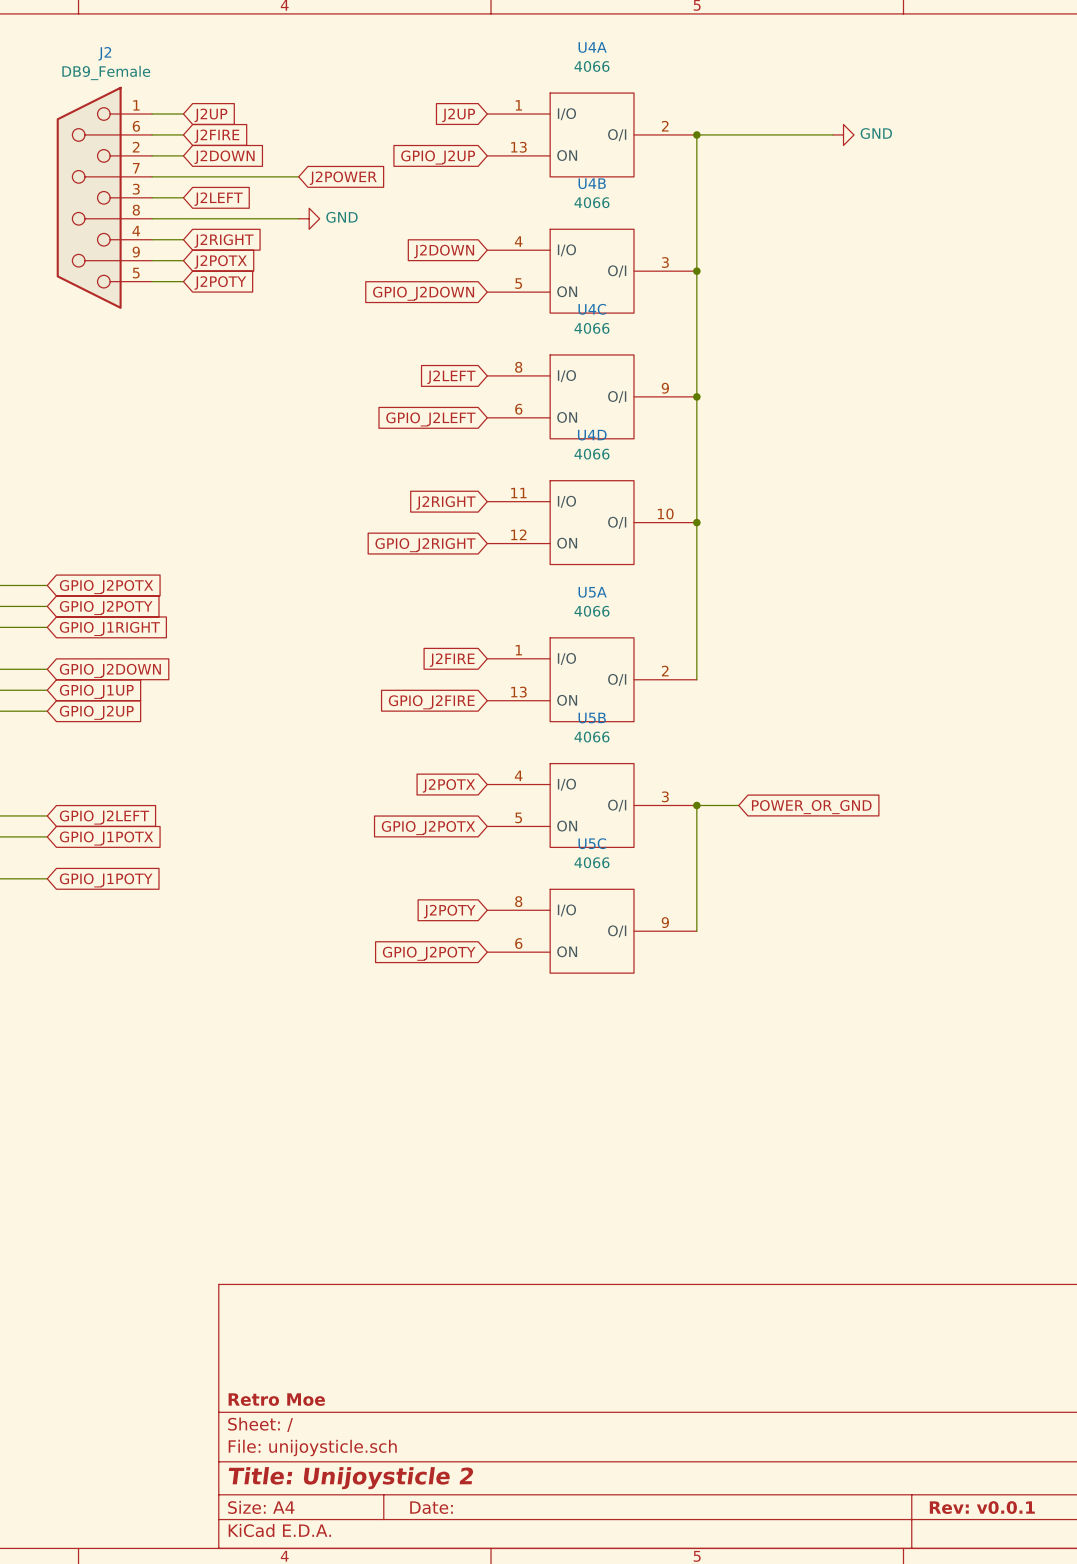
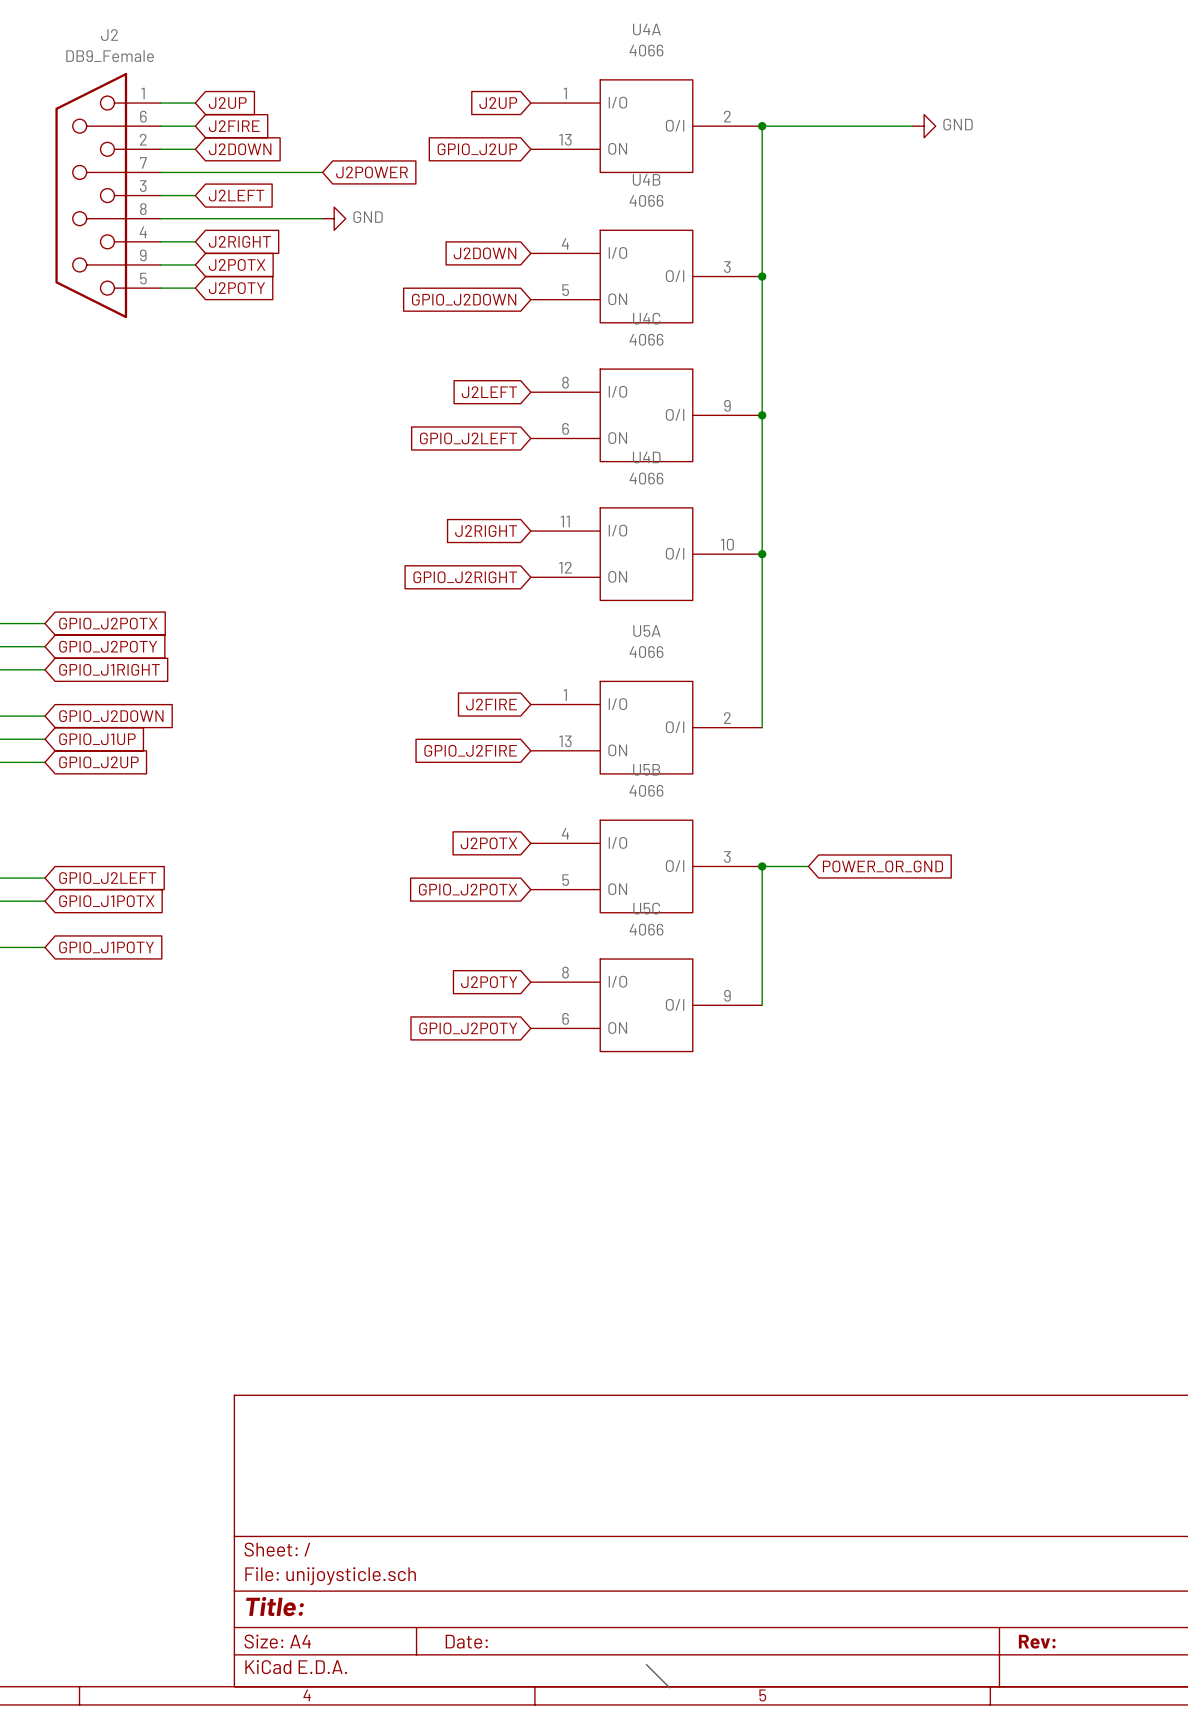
title block: Retro Moe (276, 1399) -> none
title block: Title: Unijoysticle 2 (351, 1478) -> Title: (275, 1606)
title block: Rev: v0.0.1 (982, 1507) -> Rev: (1037, 1641)
bus: none -> (646, 1664) (669, 1687)

